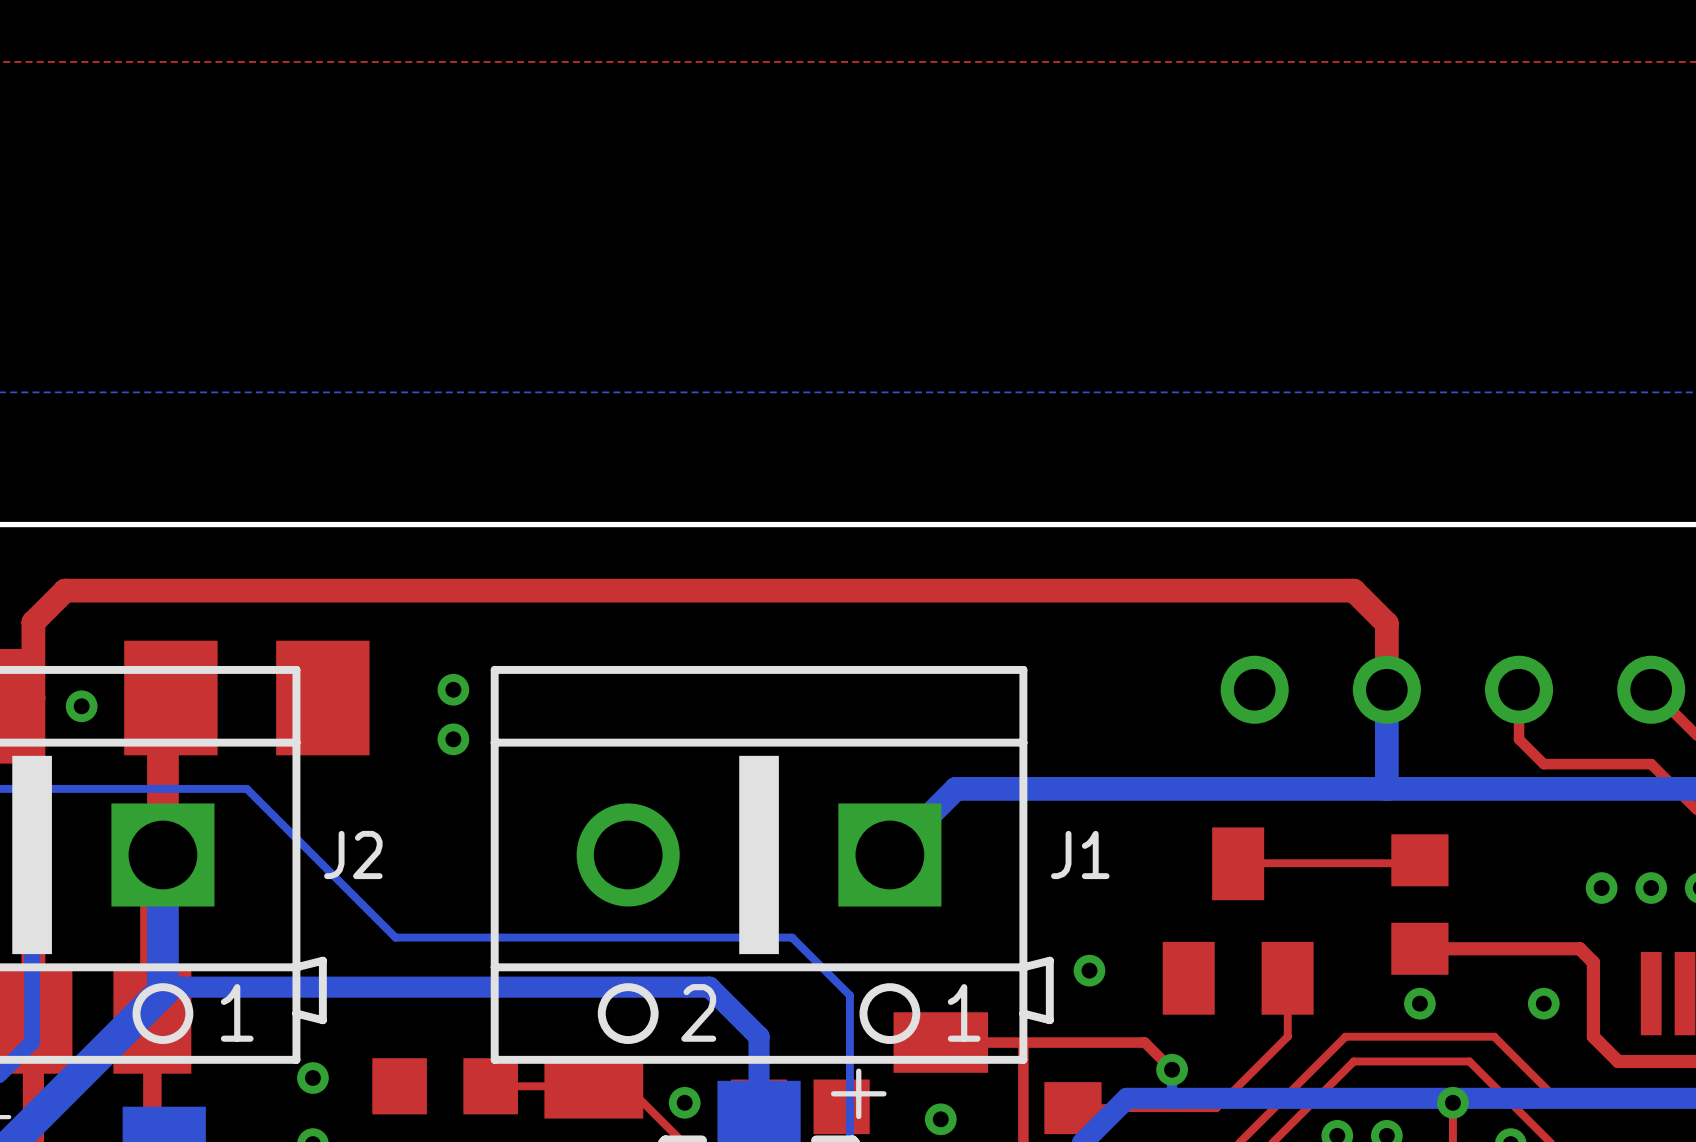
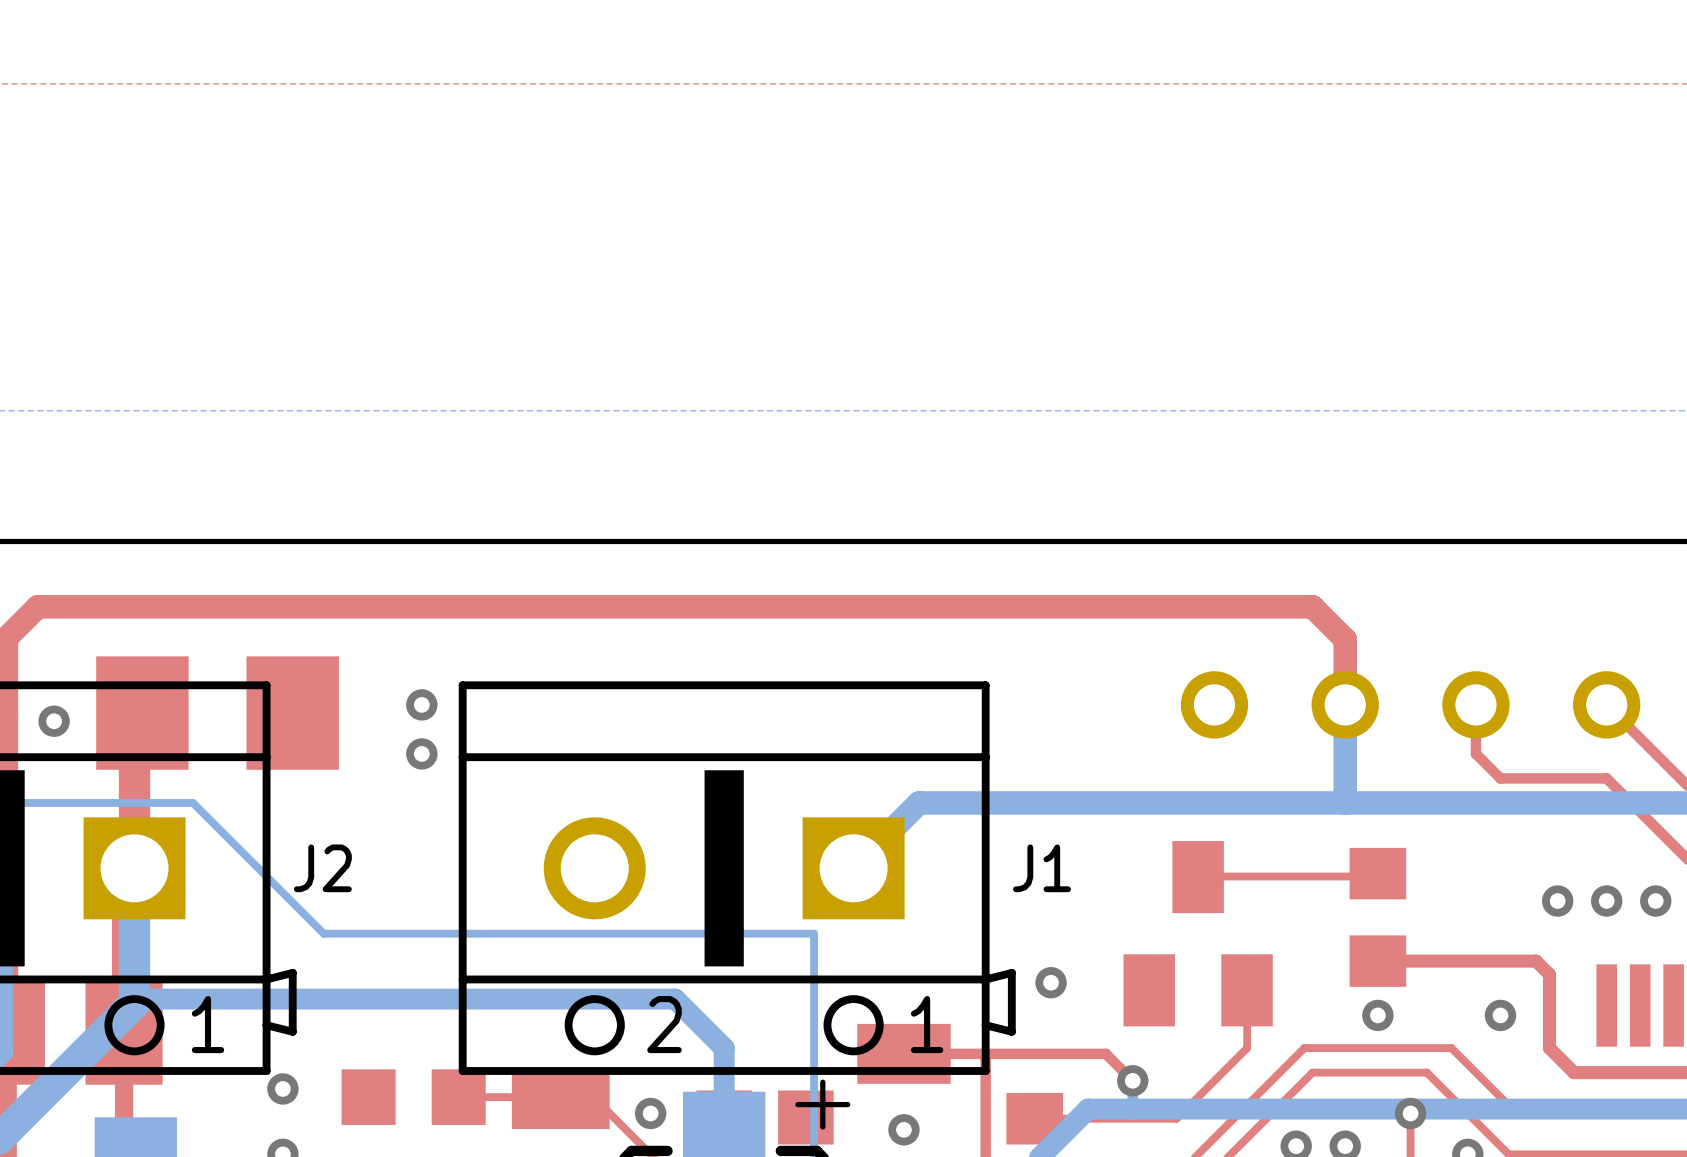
bottom track: (222, 788) (246, 788) (395, 937) (792, 937) (849, 995) -> (193, 802) (323, 933) (814, 933) (814, 1007)

